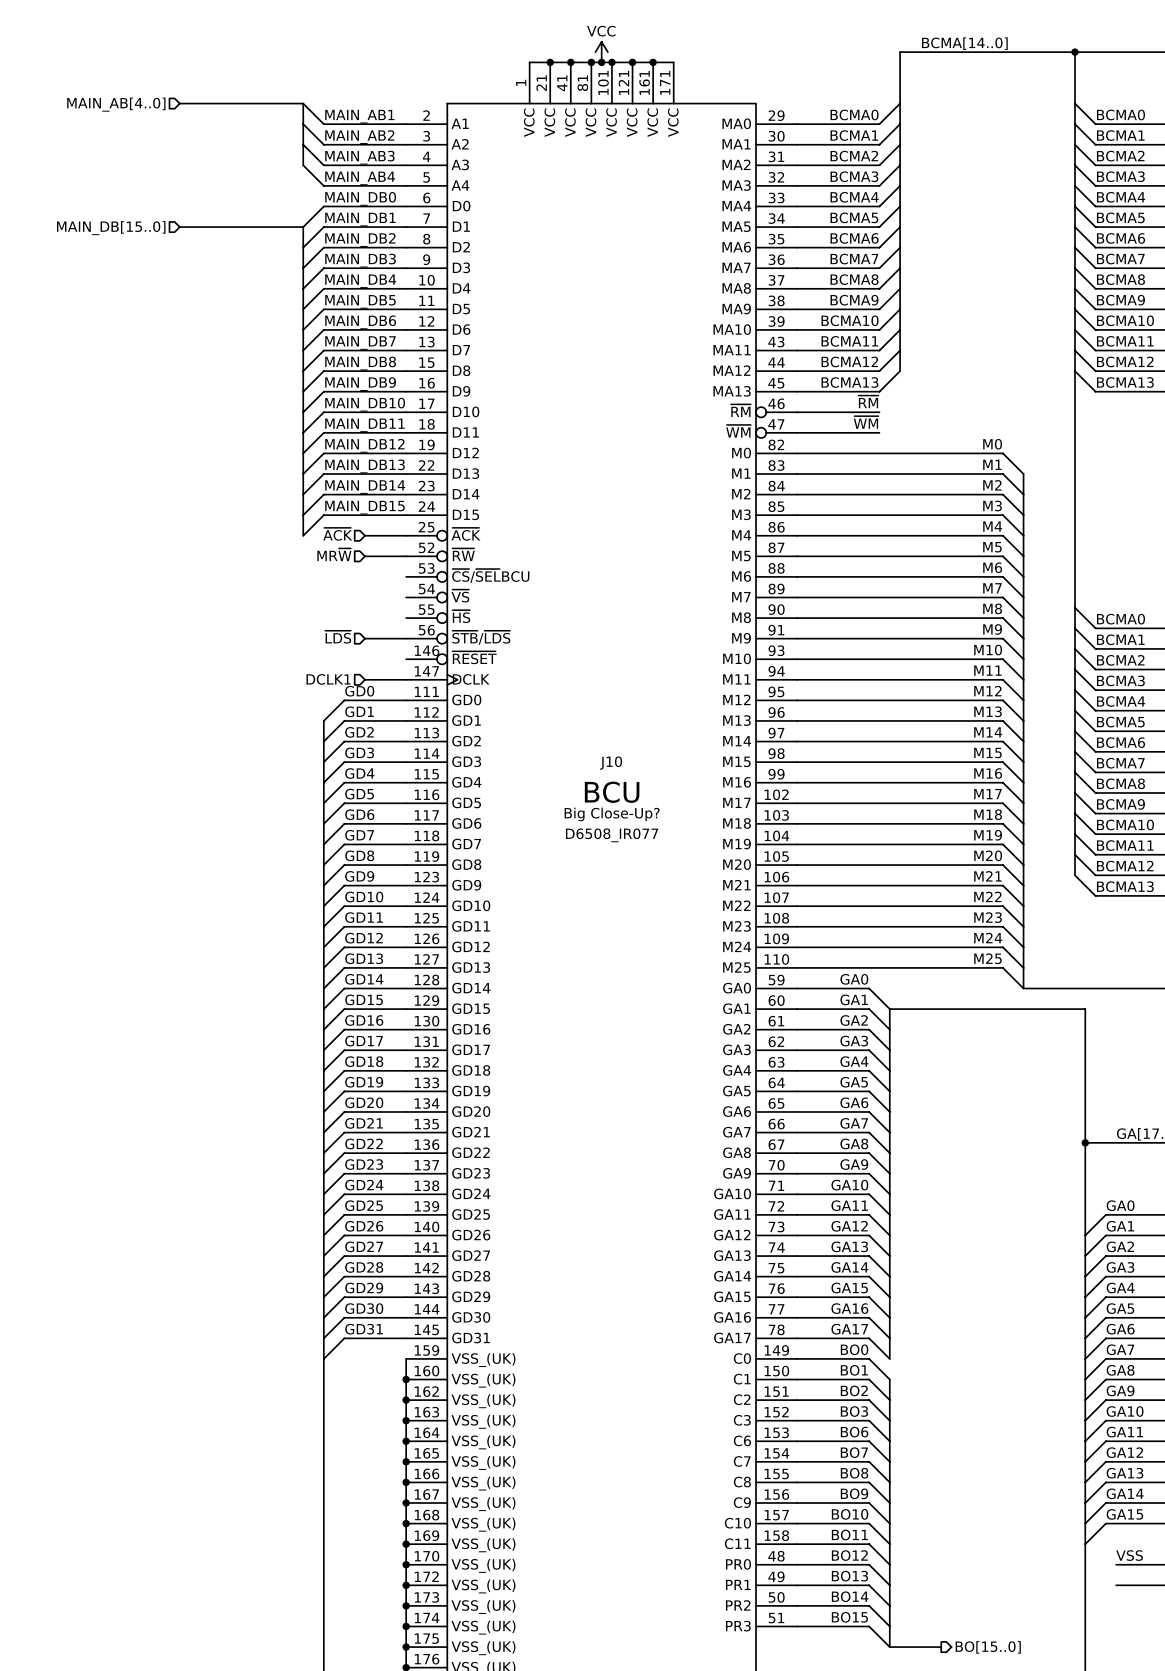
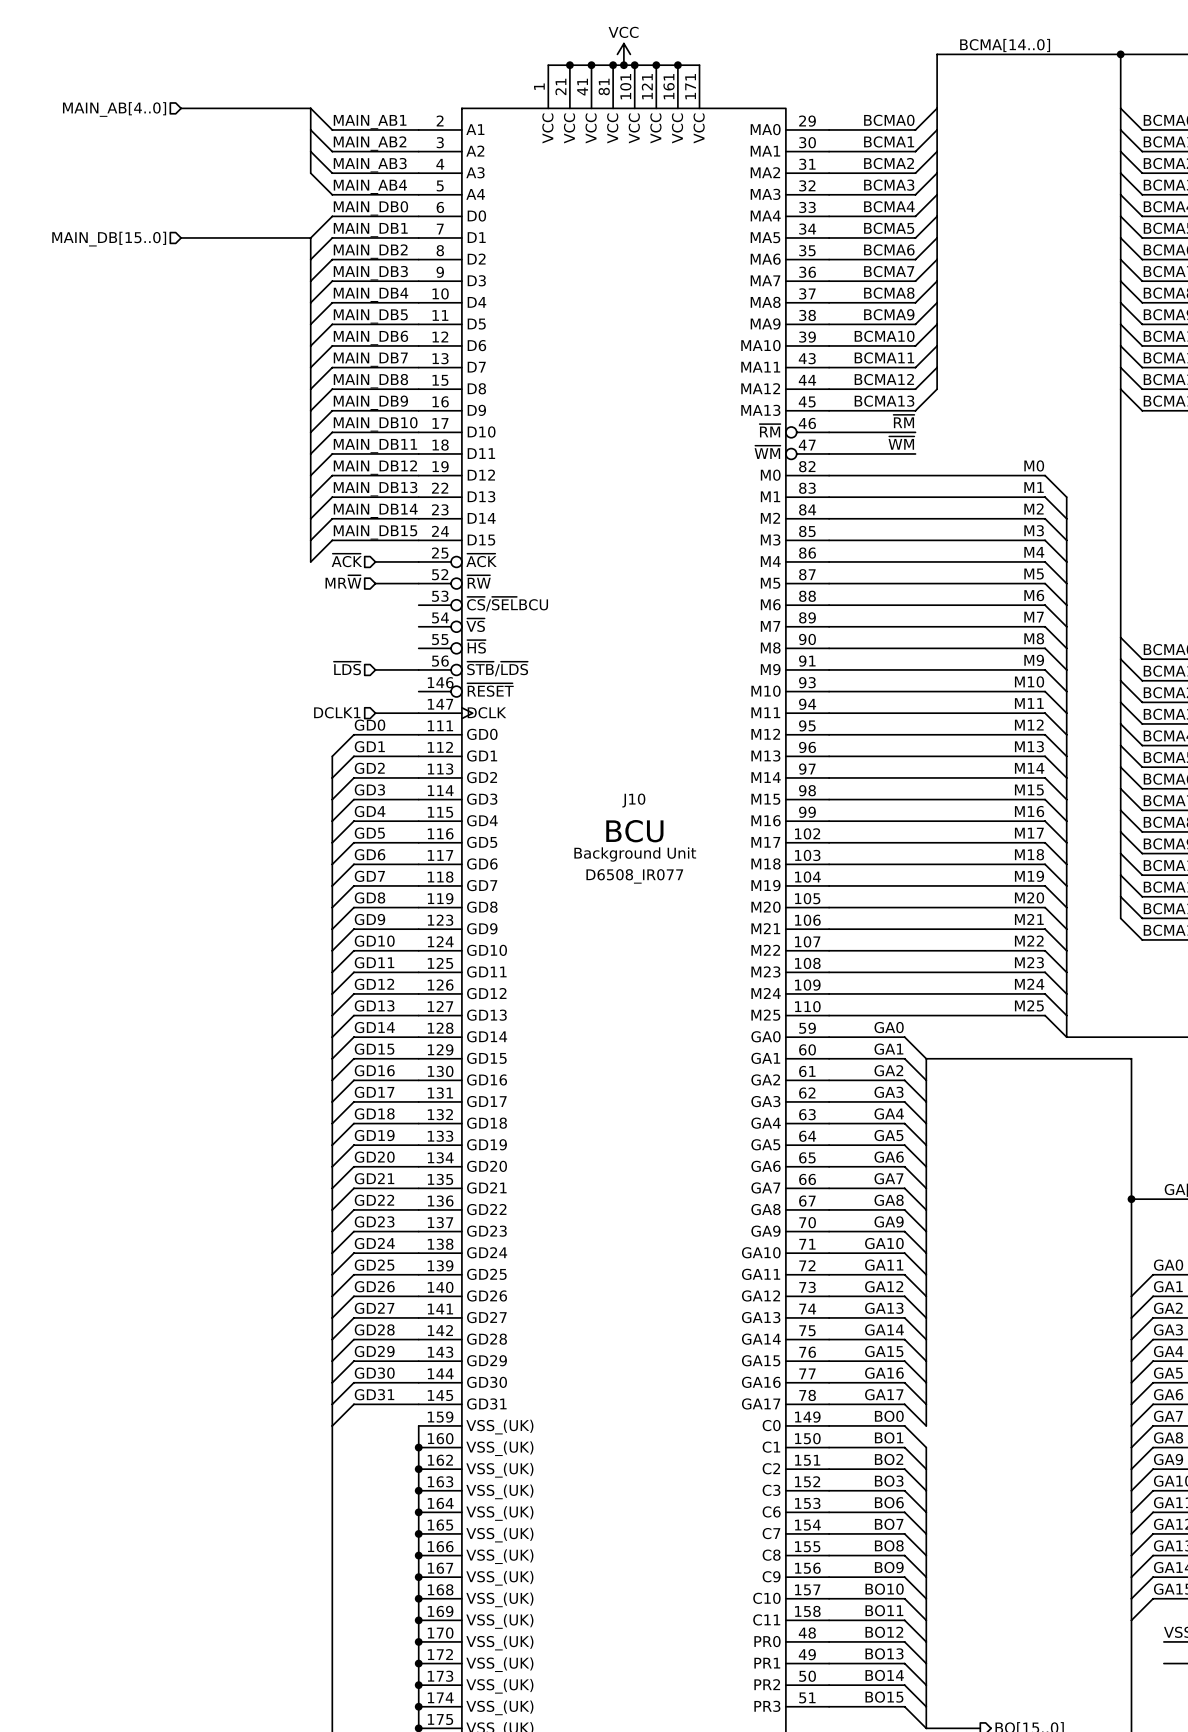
J10 text: Big Close-Up? (612, 814) -> Background Unit (635, 854)

